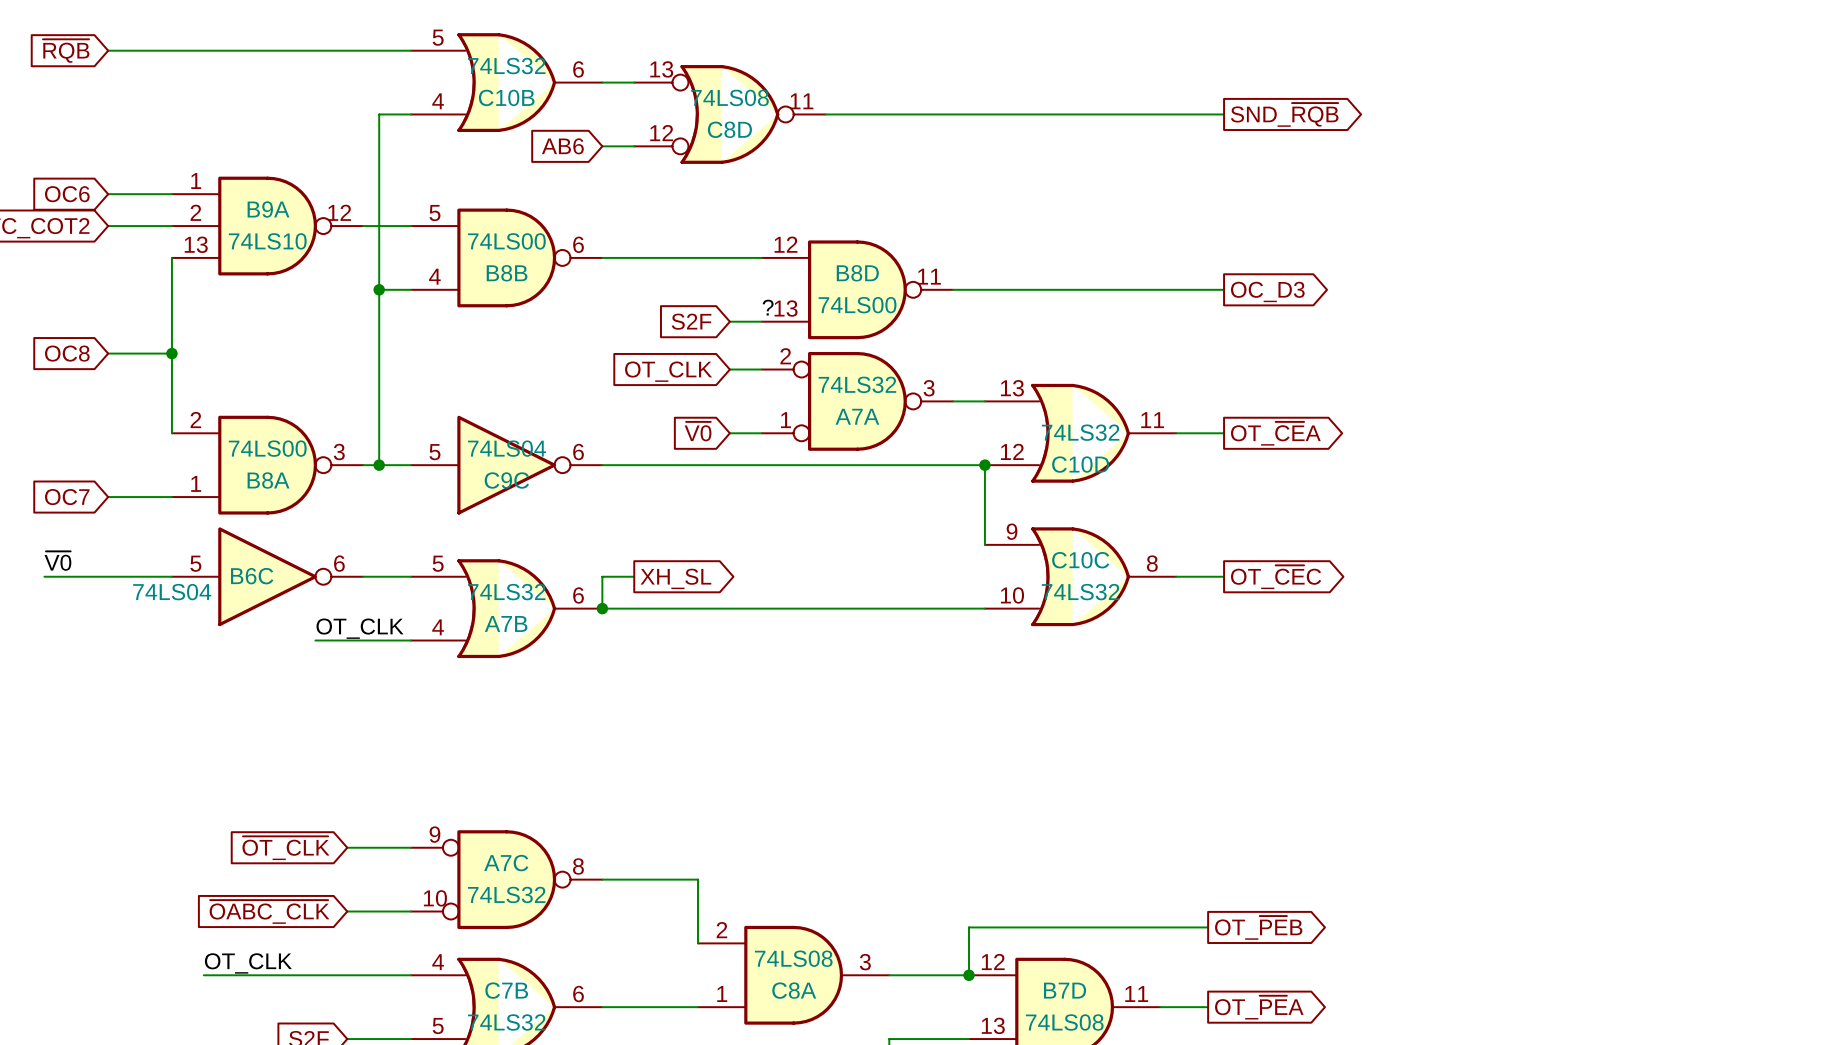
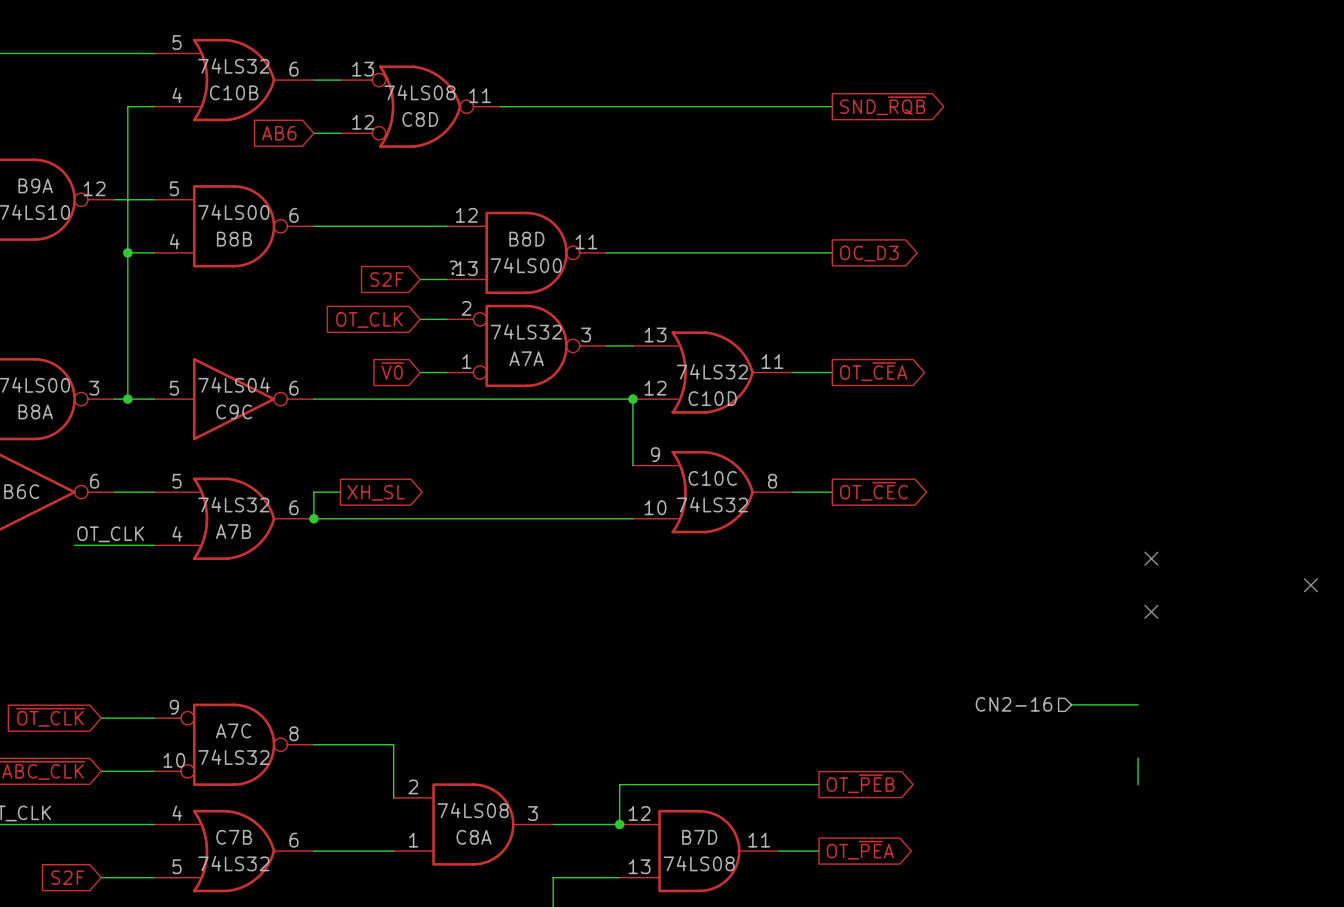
no-connect mark: none -> (1151, 558)
no-connect mark: none -> (1310, 585)
no-connect mark: none -> (1151, 611)
hierarchical label: none -> CN2-16 (1013, 704)
wire: none -> (1071, 704) (1138, 704)
wire: none -> (1138, 758) (1138, 784)

